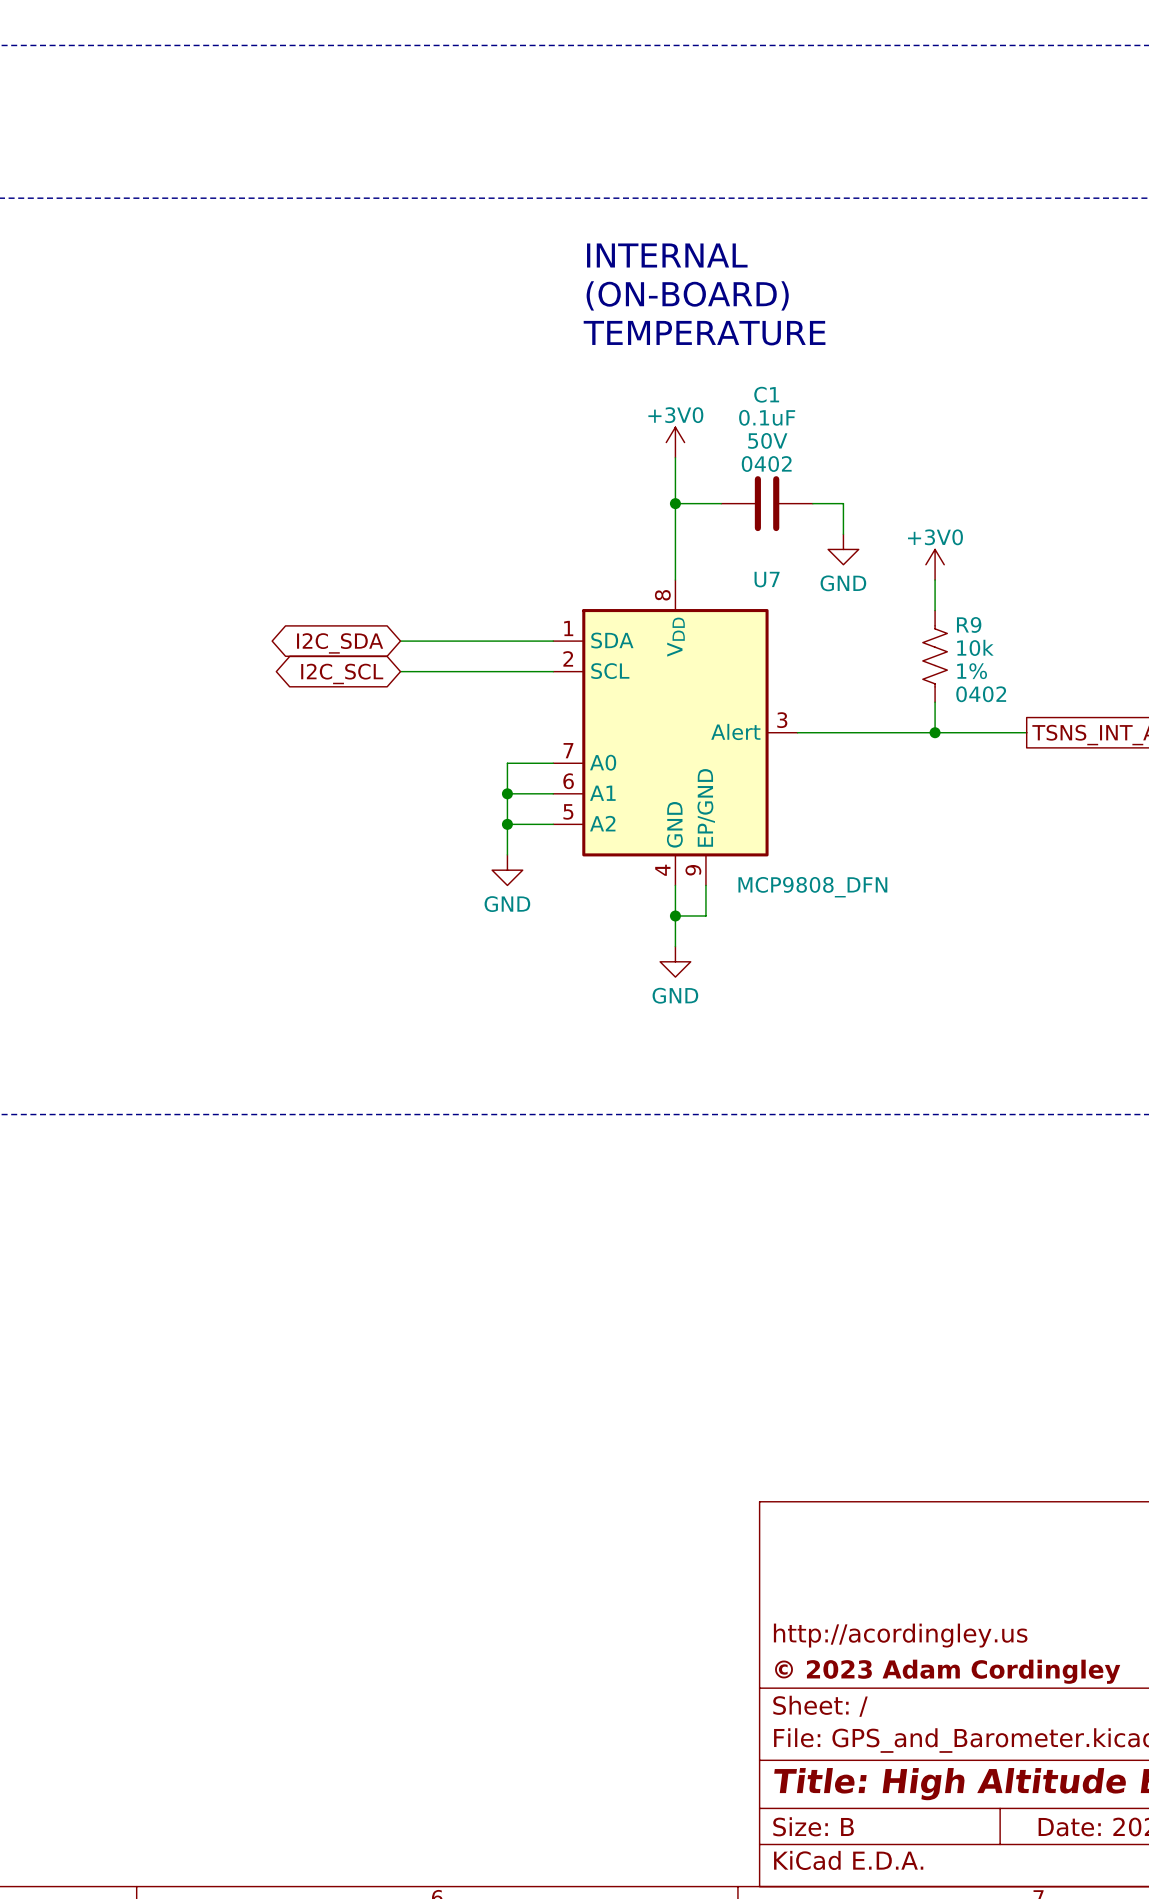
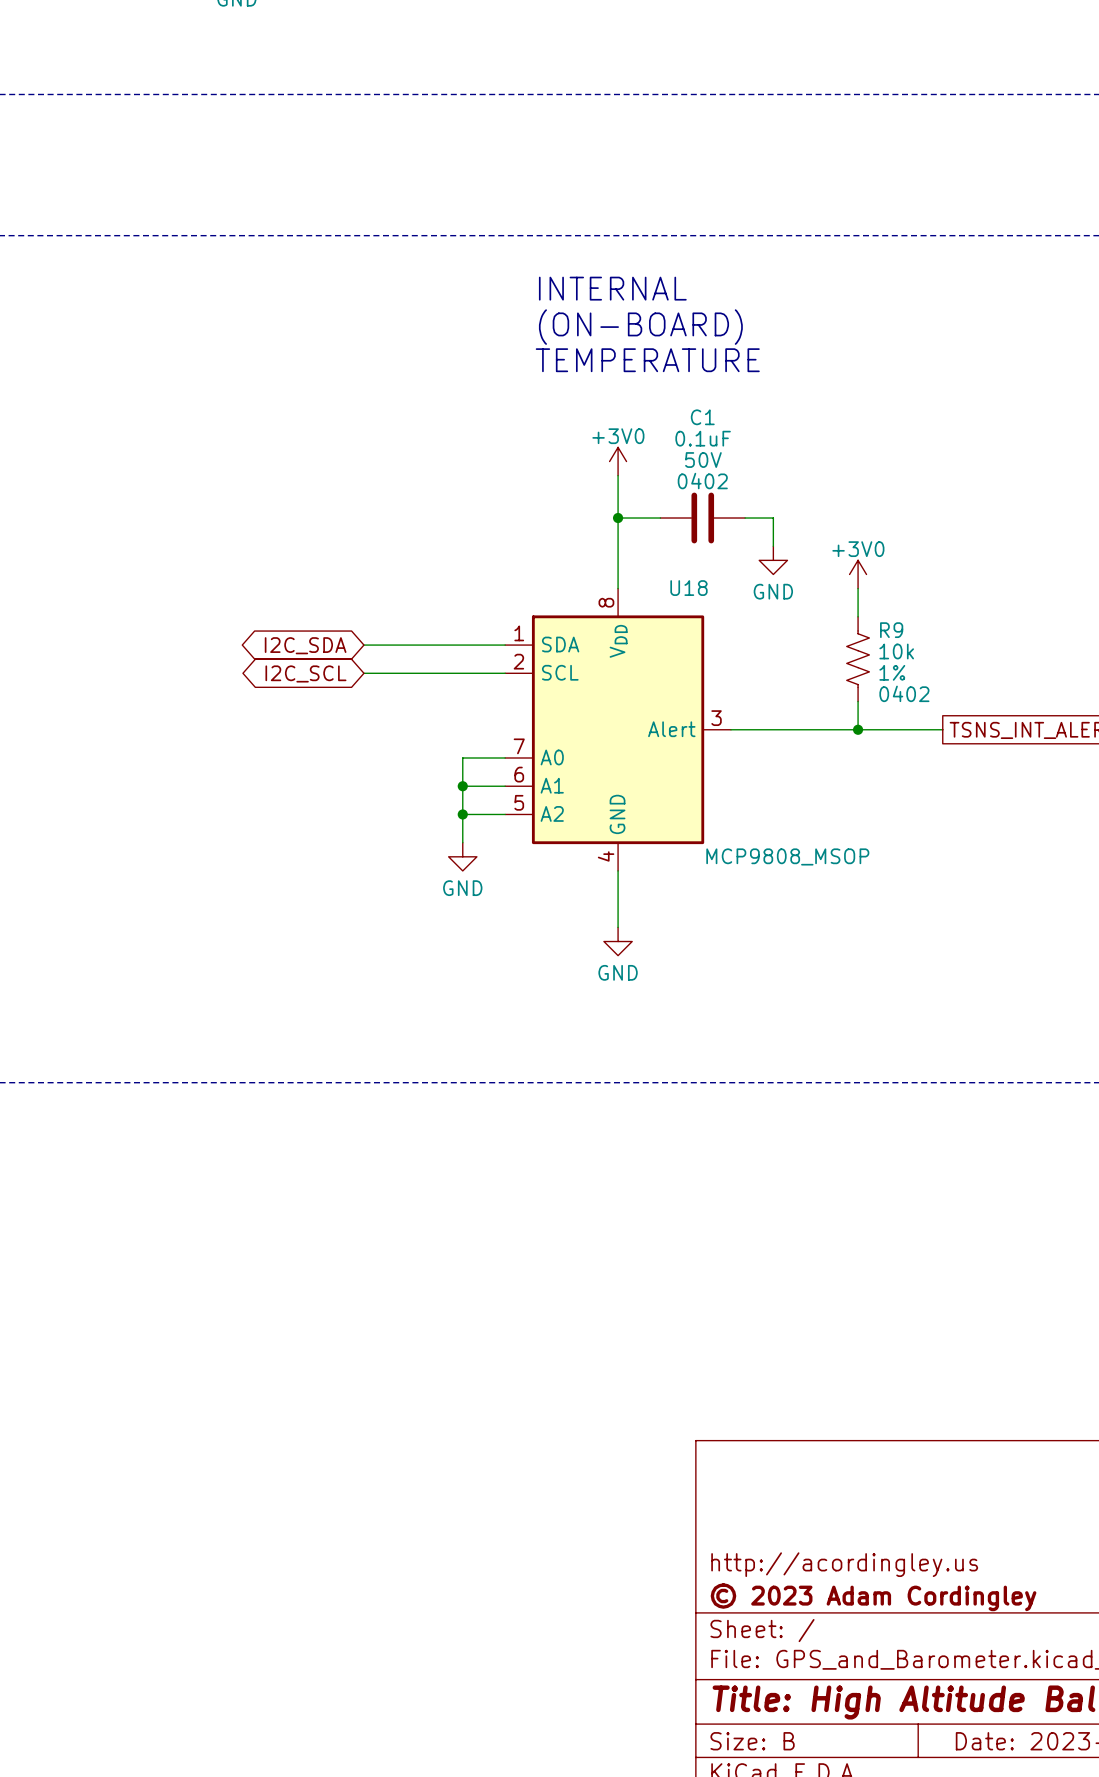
U7: MCP9808_DFN (675, 732) -> none
U18: none -> MCP9808_MSOP (618, 729)
wire: (705, 885) (705, 915) (675, 915) -> none
junction: (675, 915) -> none

